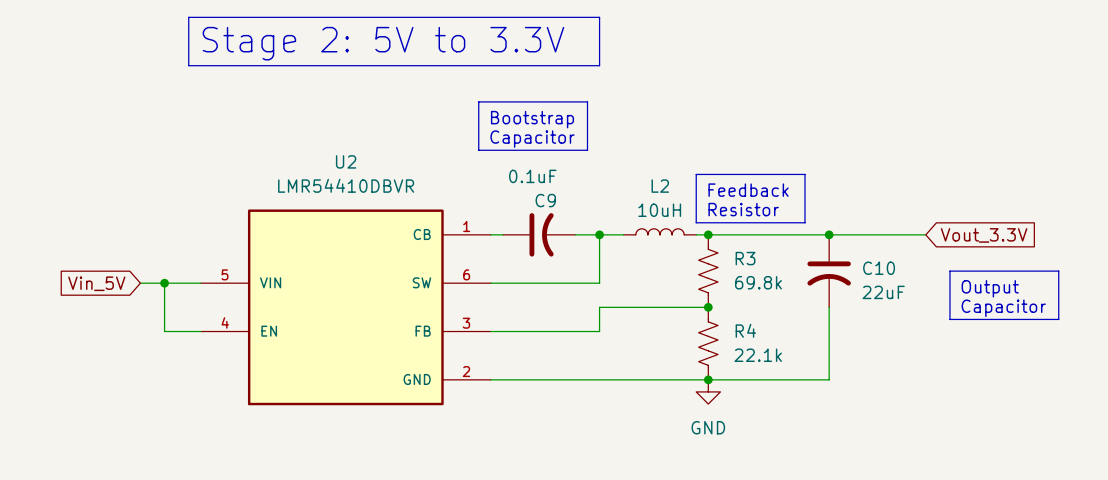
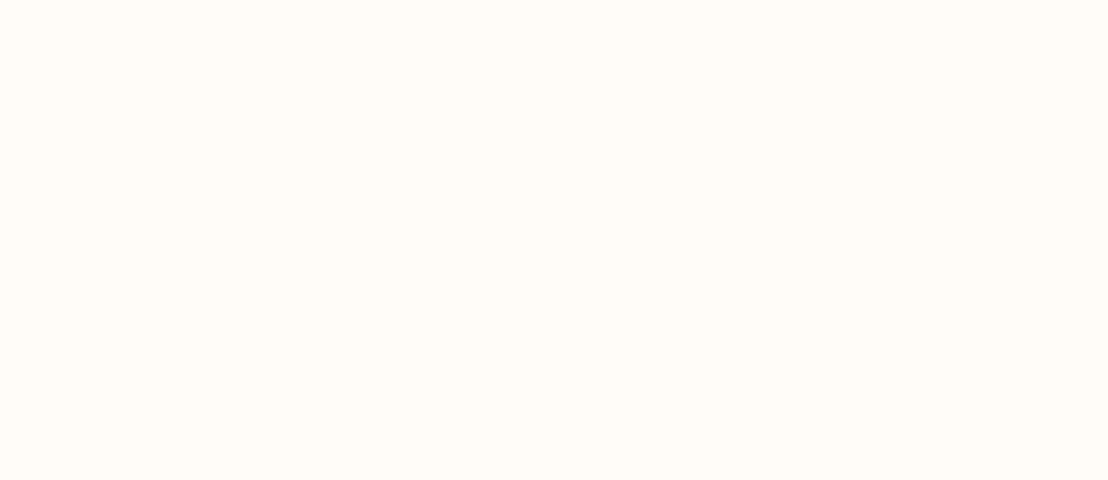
line: (188, 17) (599, 17) (599, 65) (188, 65) (188, 17) -> none
text: Stage 2: 5V to 3.3V (383, 43) -> none
line: (478, 101) (587, 101) (587, 150) (478, 150) (478, 101) -> none
text: Bootstrap (532, 119) -> none
text: Capacitor (532, 139) -> none
line: (696, 174) (804, 174) (804, 222) (696, 222) (696, 174) -> none
text: Feedback (748, 190) -> none
text: Resistor (743, 209) -> none
L2: 10uH (659, 231) -> none
wire: (490, 234) (502, 234) -> none
C9: 0.1uF (539, 234) -> none
wire: (575, 234) (623, 234) -> none
wire: (599, 234) (599, 283) (490, 283) -> none
junction: (599, 234) -> none
wire: (696, 234) (925, 234) -> none
junction: (708, 234) -> none
junction: (829, 234) -> none
global label: Vout_3.3V (984, 235) -> none
R3: 69.8k (708, 271) -> none
C10: 22uF (829, 271) -> none
line: (949, 271) (1058, 271) (1058, 319) (949, 319) (949, 271) -> none
global label: Vin_5V (96, 283) -> none
wire: (140, 283) (200, 283) -> none
wire: (164, 283) (164, 331) (200, 331) -> none
junction: (164, 283) -> none
text: Output (990, 288) -> none
U2: LMR54410DBVR (345, 307) -> none
wire: (708, 307) (599, 307) (599, 331) (490, 331) -> none
junction: (708, 307) -> none
wire: (829, 307) (829, 379) (490, 379) -> none
text: Capacitor (1003, 308) -> none
R4: 22.1k (708, 343) -> none
junction: (708, 379) -> none
power symbol: GND (708, 391) -> none

